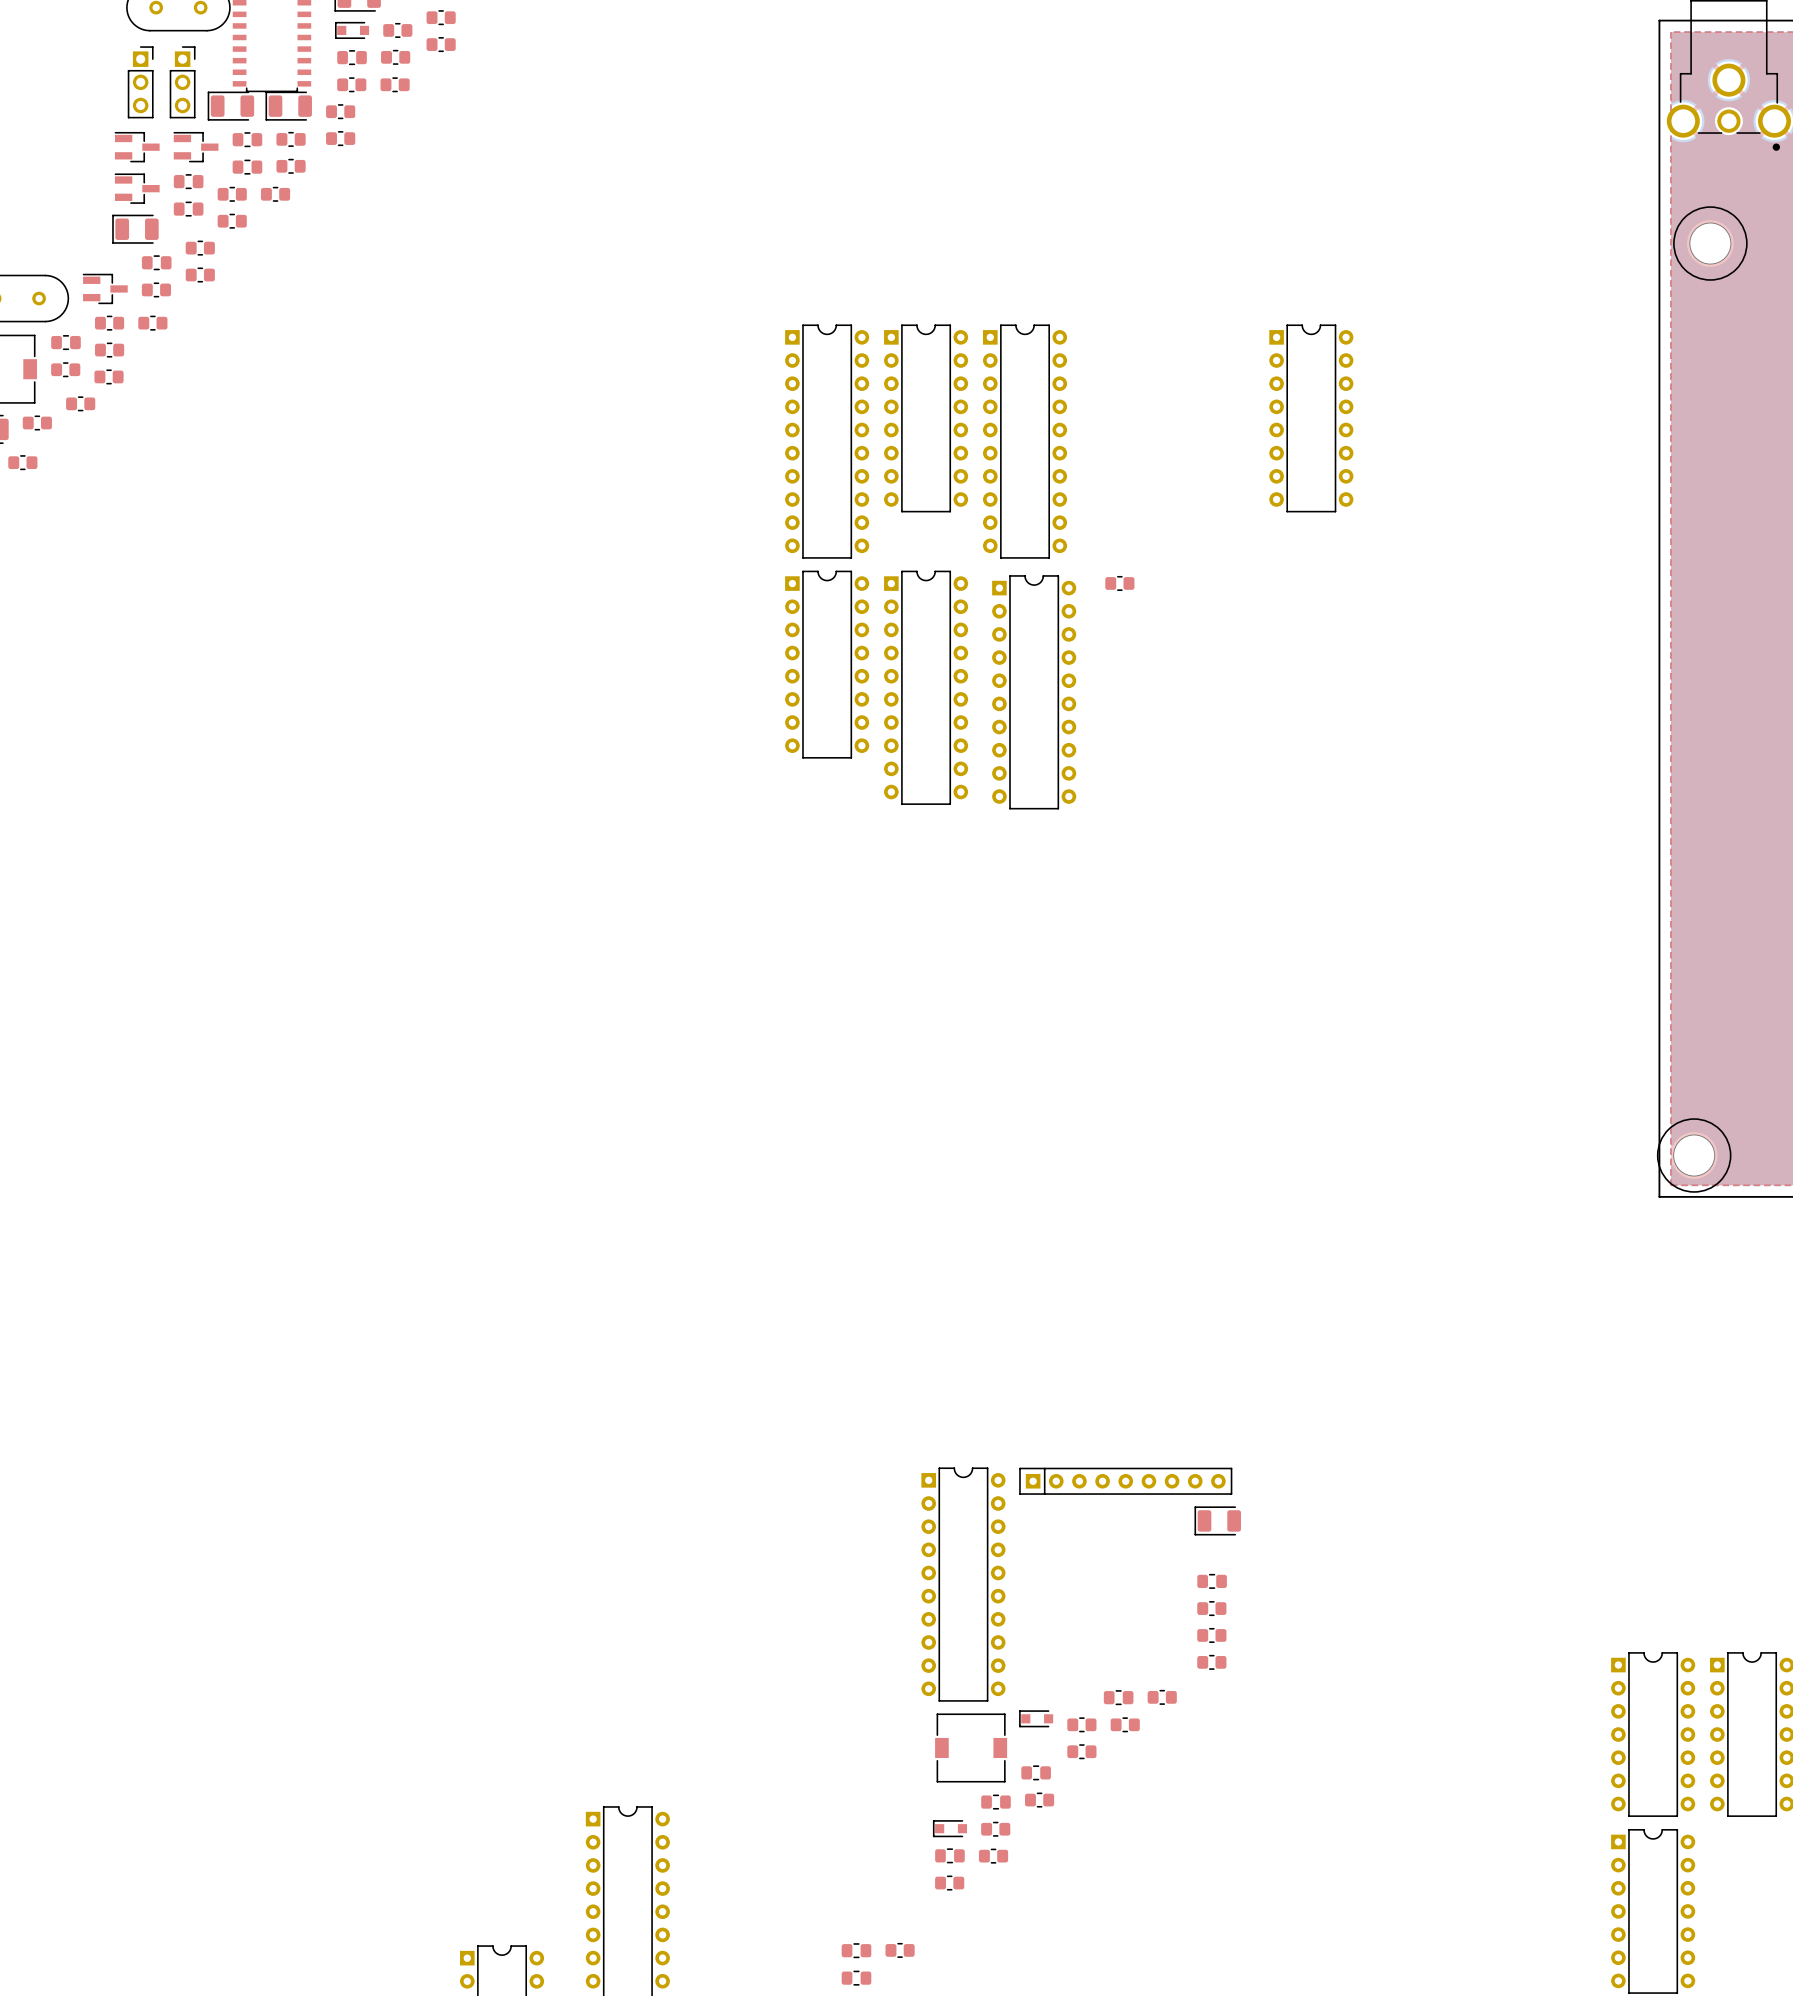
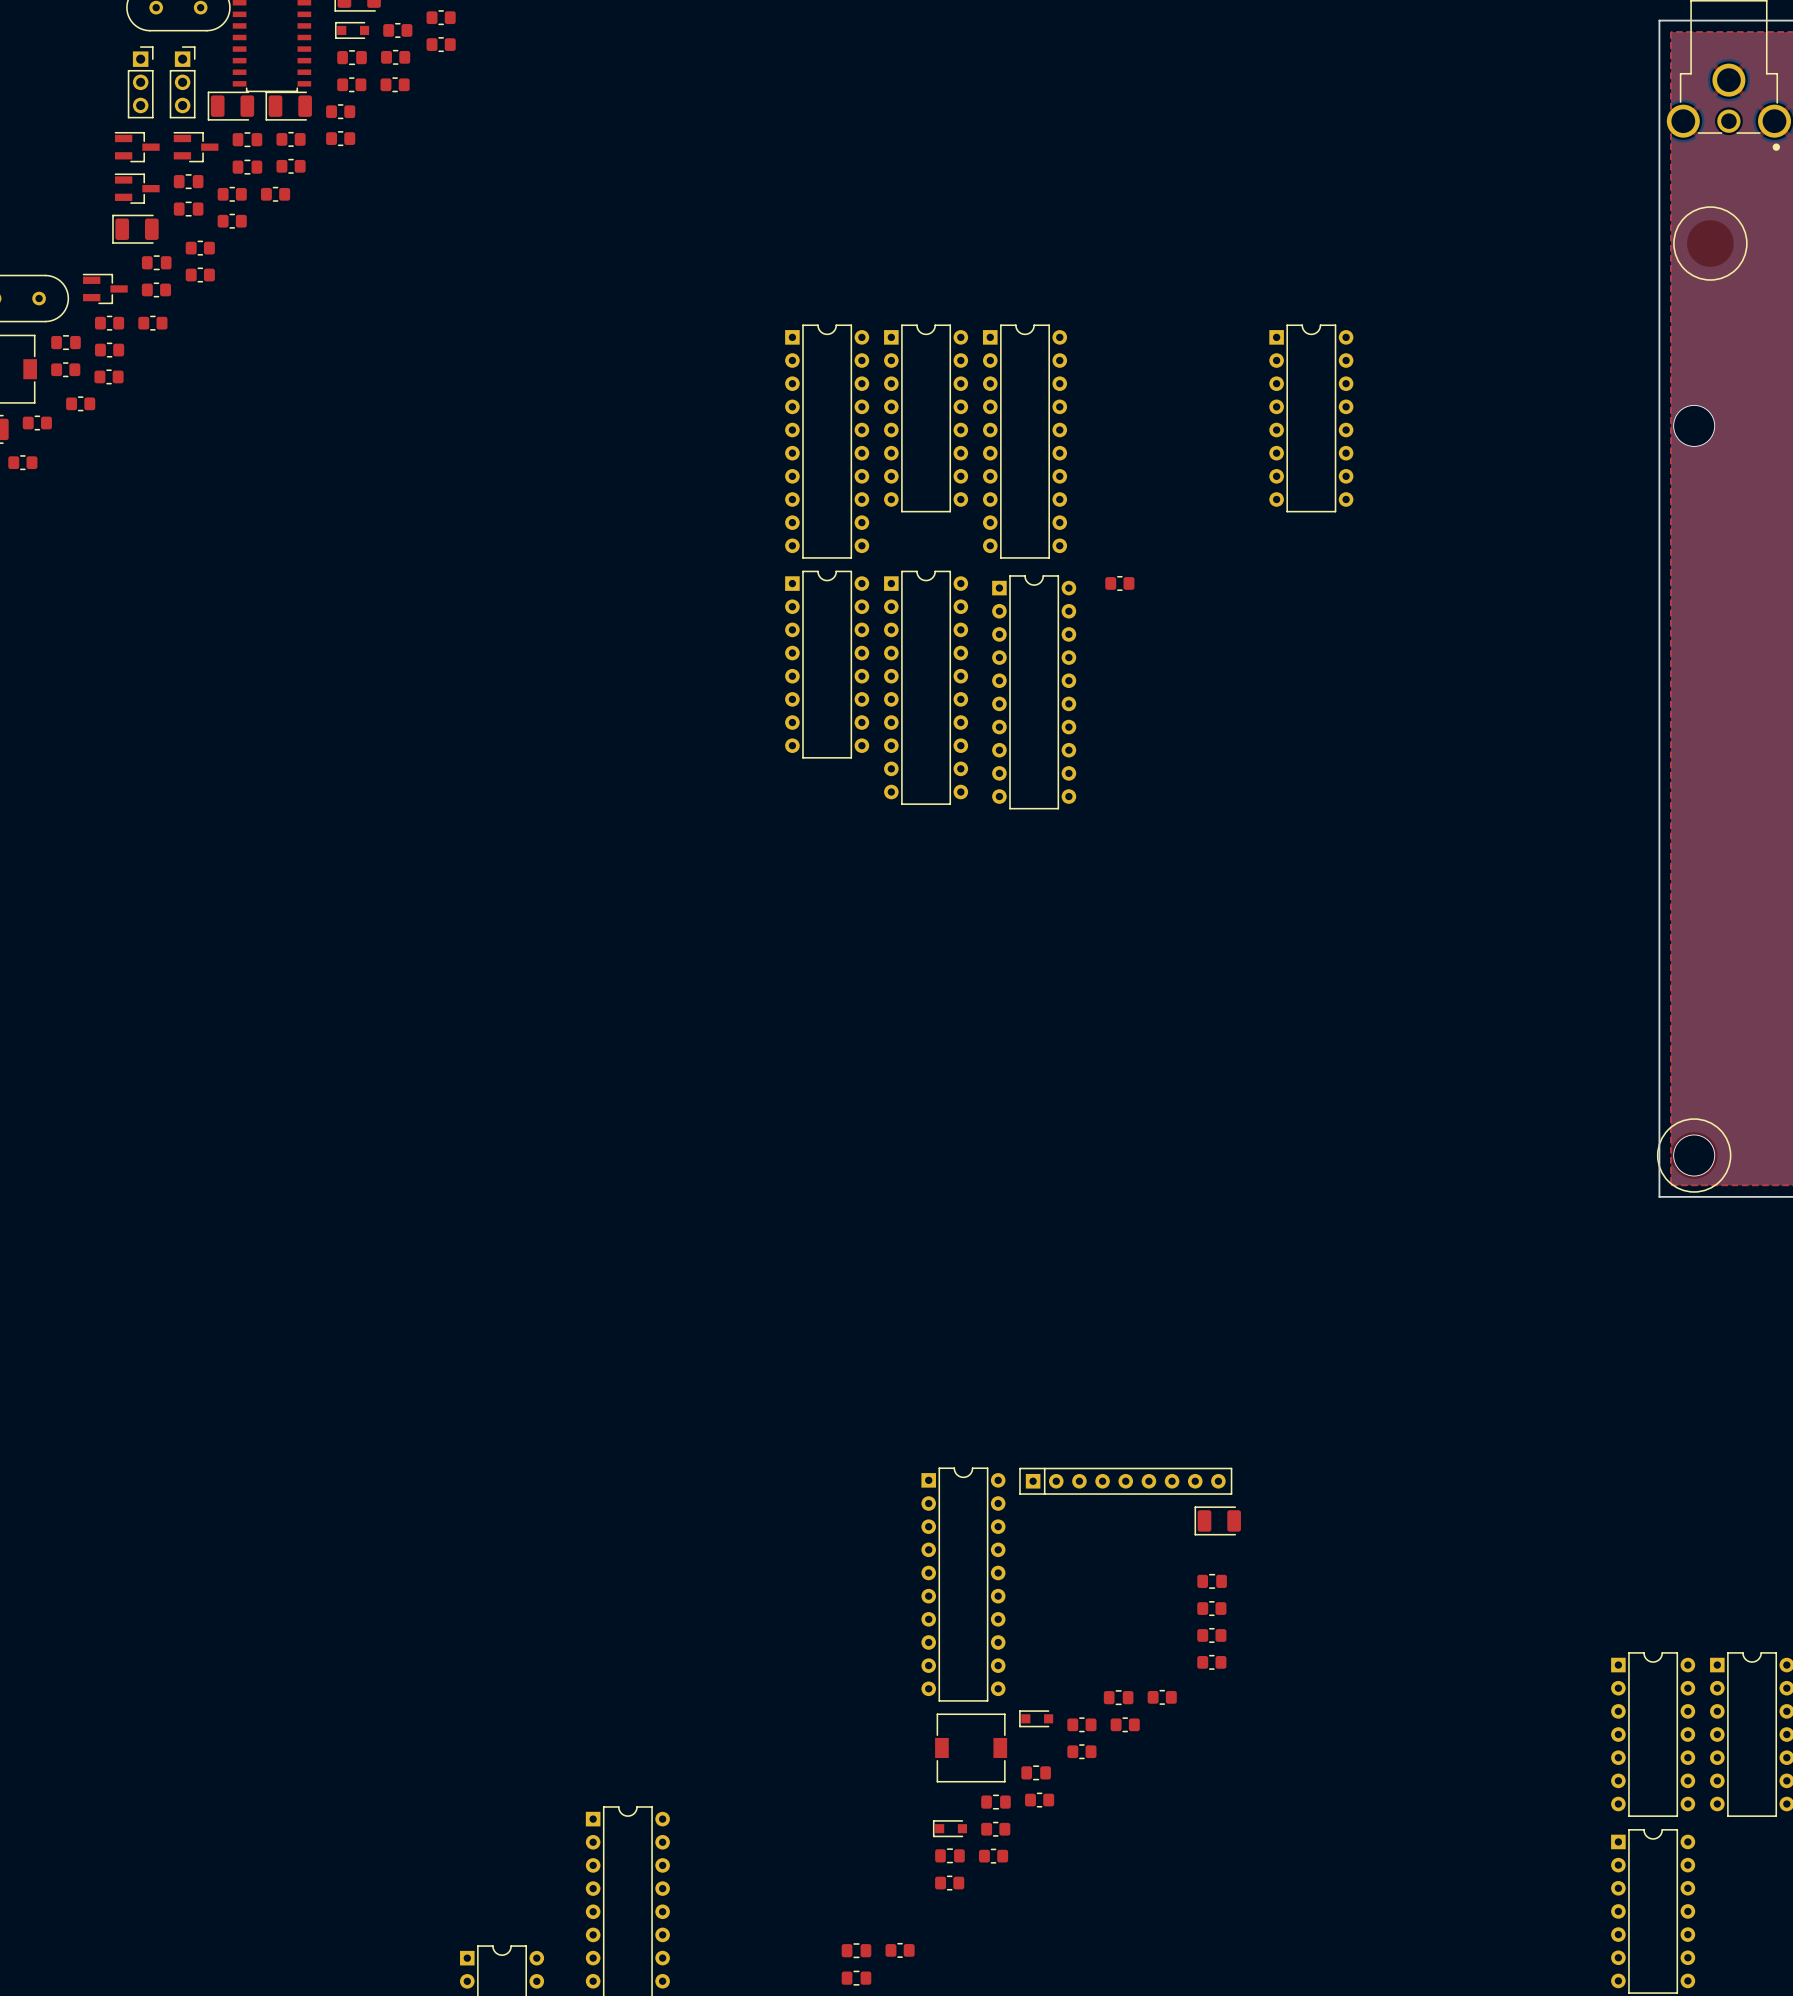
via: (1710, 243) -> none
via: none -> (1694, 425)

